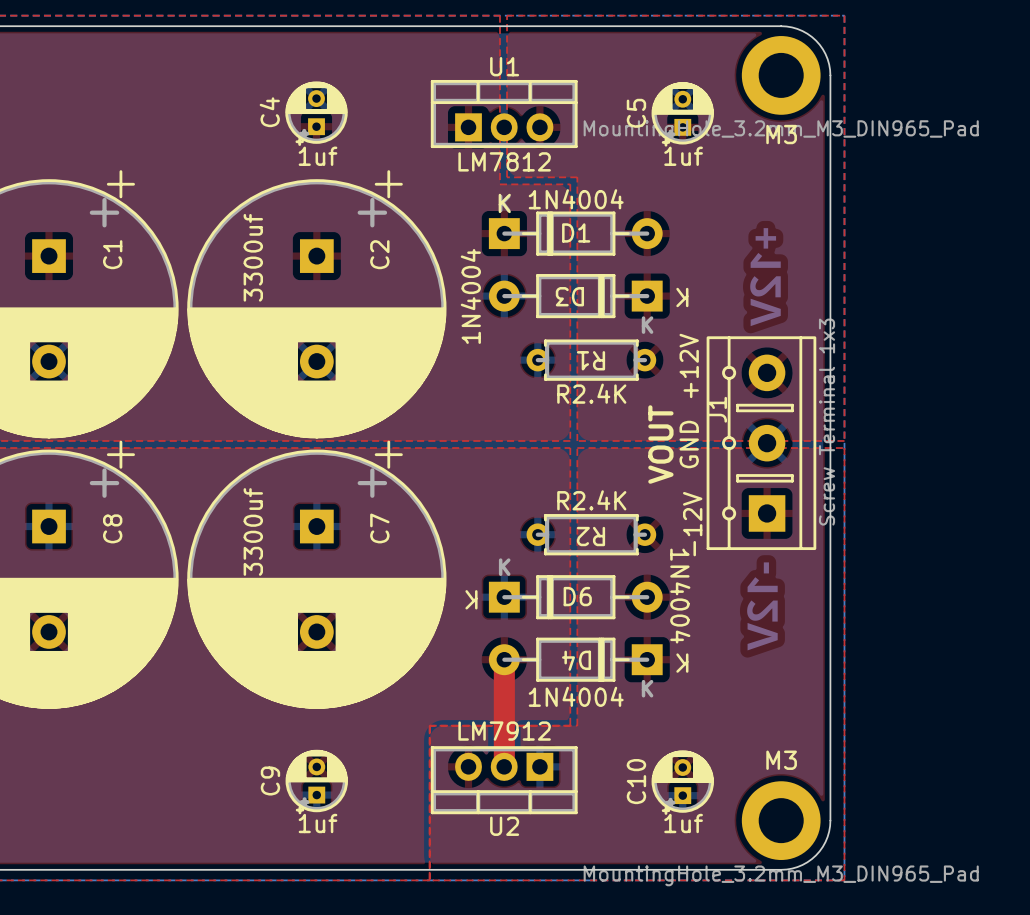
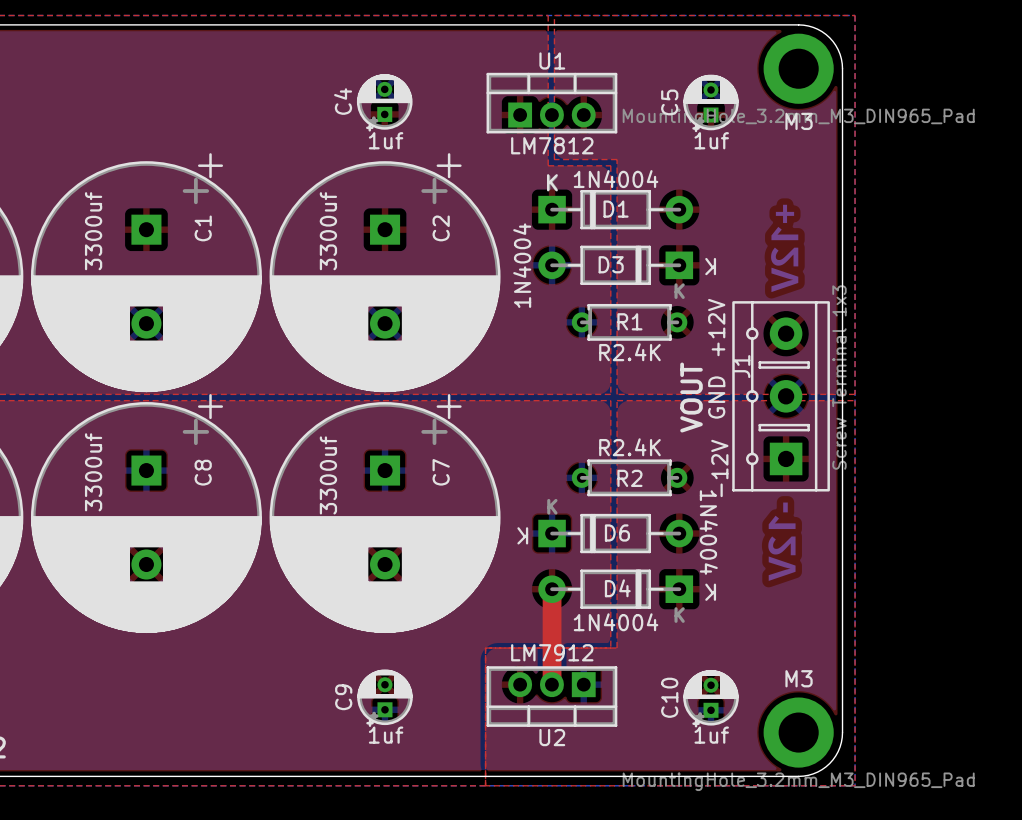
D3 name rotation: 0° (569, 296) -> 180° (611, 264)
R1 name rotation: 0° (590, 360) -> 180° (629, 321)
R2 name rotation: 0° (590, 536) -> 180° (629, 478)
D4 name rotation: 0° (576, 660) -> 180° (617, 588)

